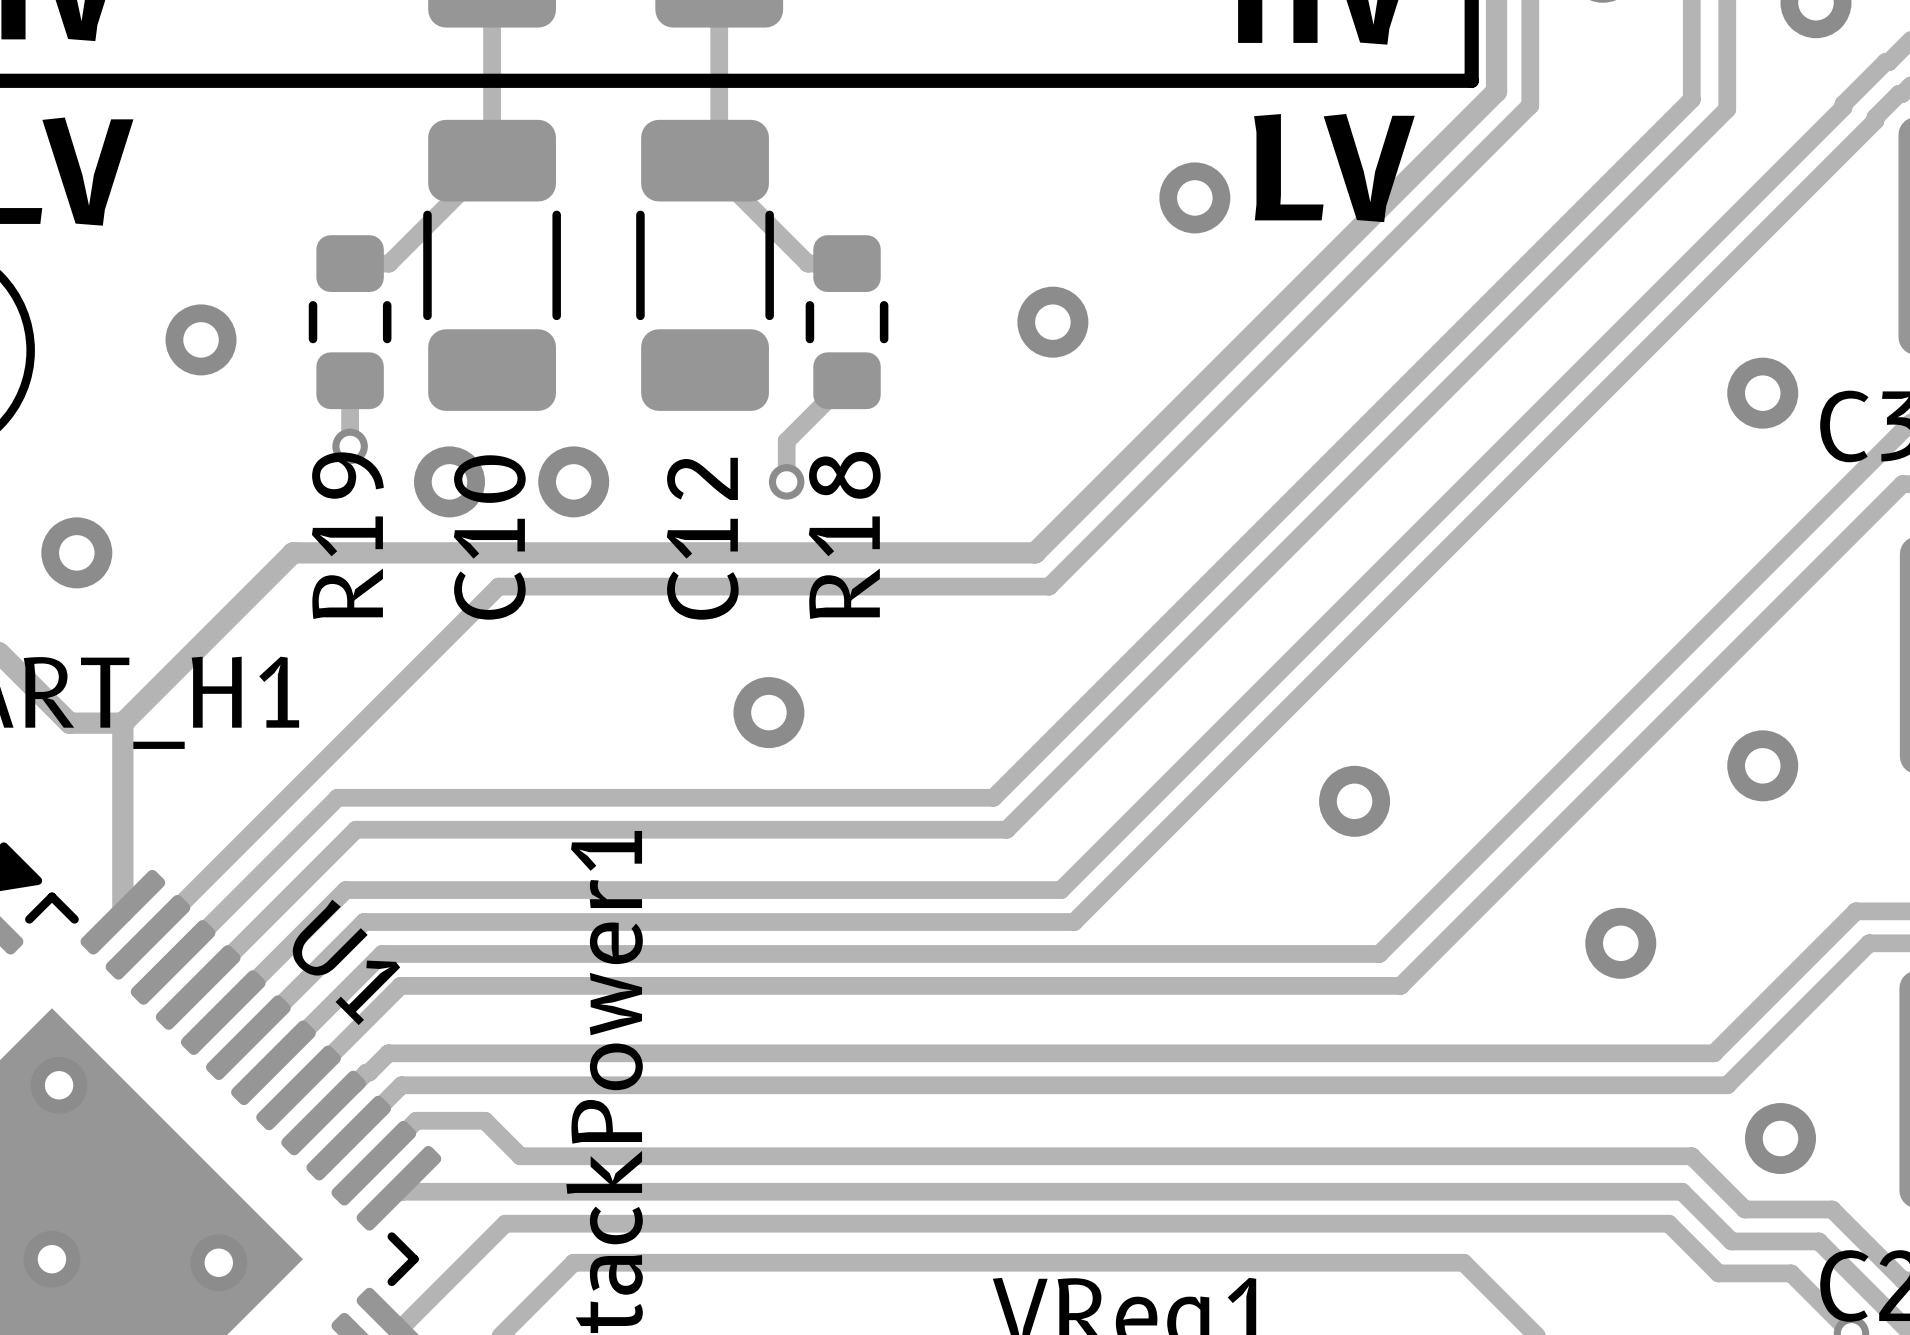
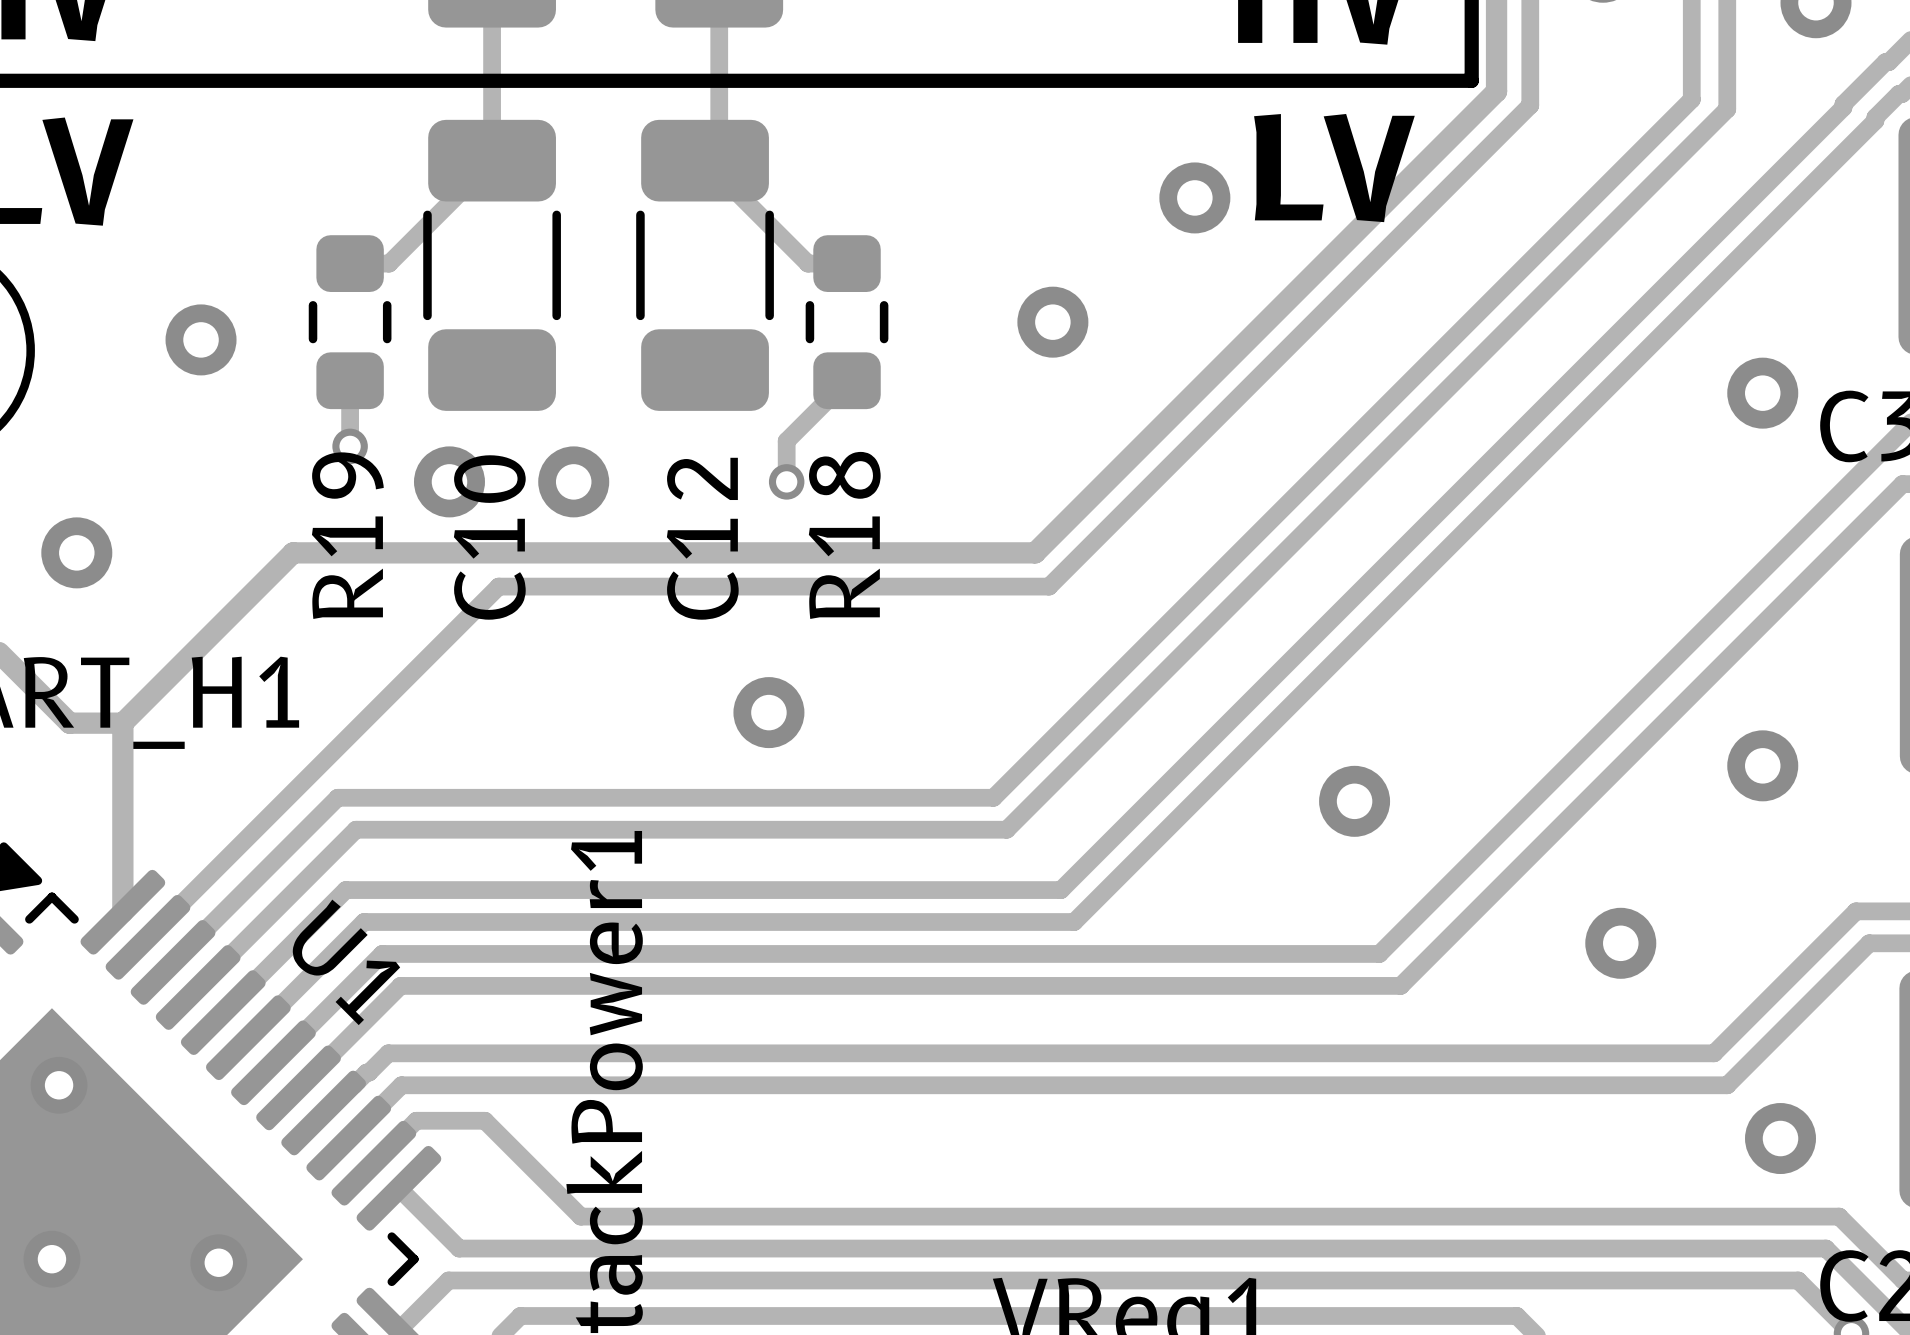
track: (520, 1156) (1691, 1156) (1745, 1209) (1832, 1209) (1839, 1216) -> (520, 1156) (580, 1216) (1839, 1216)
track: (402, 1191) (1682, 1191) (1731, 1241) (1818, 1241) (1826, 1248) -> (402, 1191) (459, 1248) (1826, 1248)
track: (448, 1280) (505, 1223) (1668, 1223) (1718, 1273) (1791, 1273) (1798, 1280) -> (448, 1280) (1798, 1280)
track: (520, 1315) (573, 1262) (1463, 1262) (1516, 1315) -> (520, 1315) (1516, 1315)

